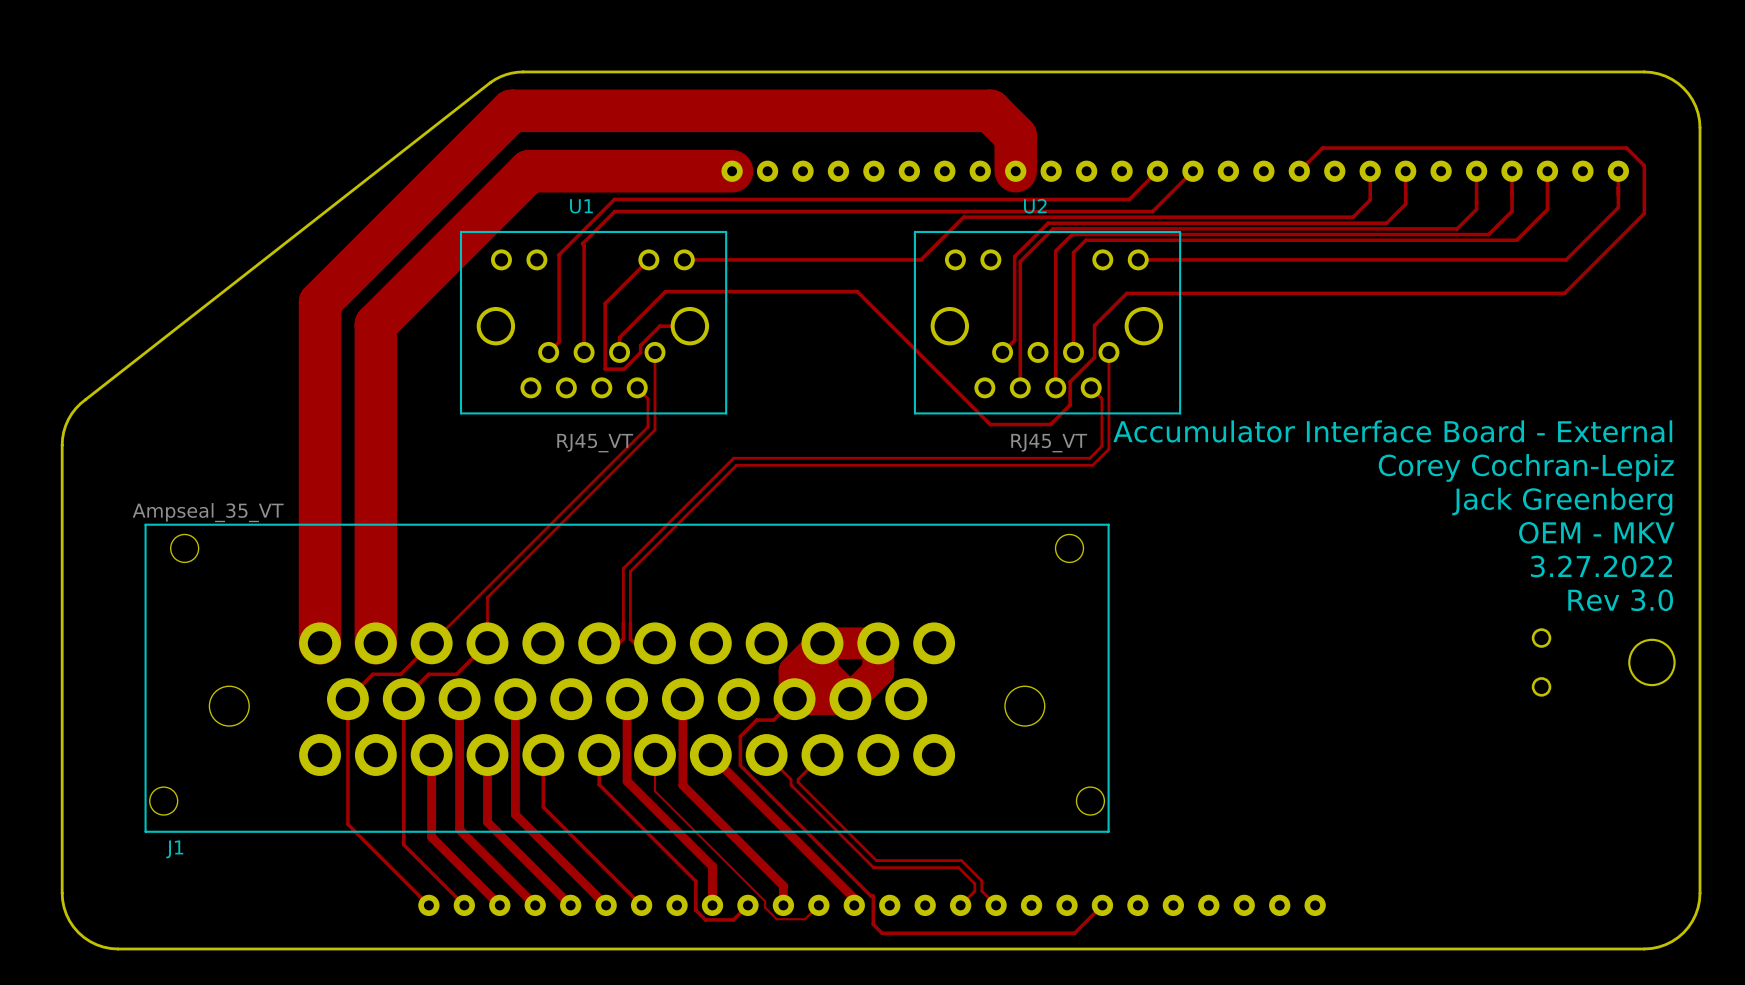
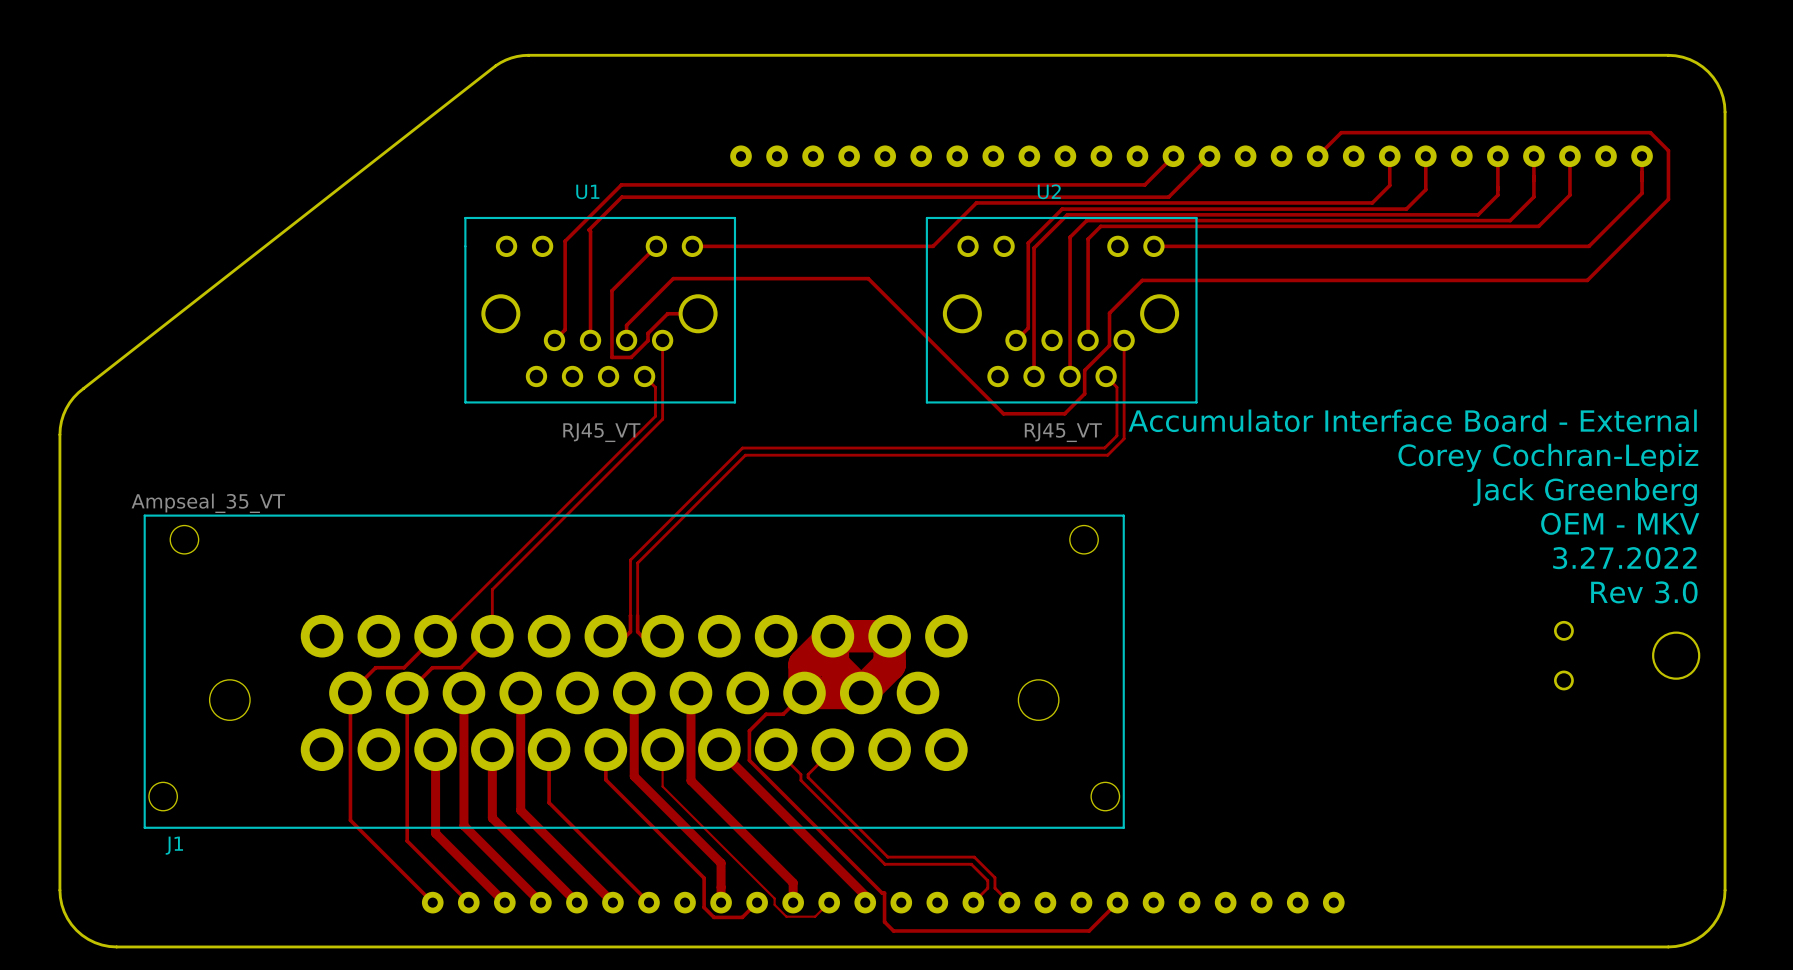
track: (732, 171) (529, 171) (375, 324) (375, 643) -> none
track: (1015, 171) (1015, 136) (990, 110) (511, 110) (320, 302) (320, 643) -> none

